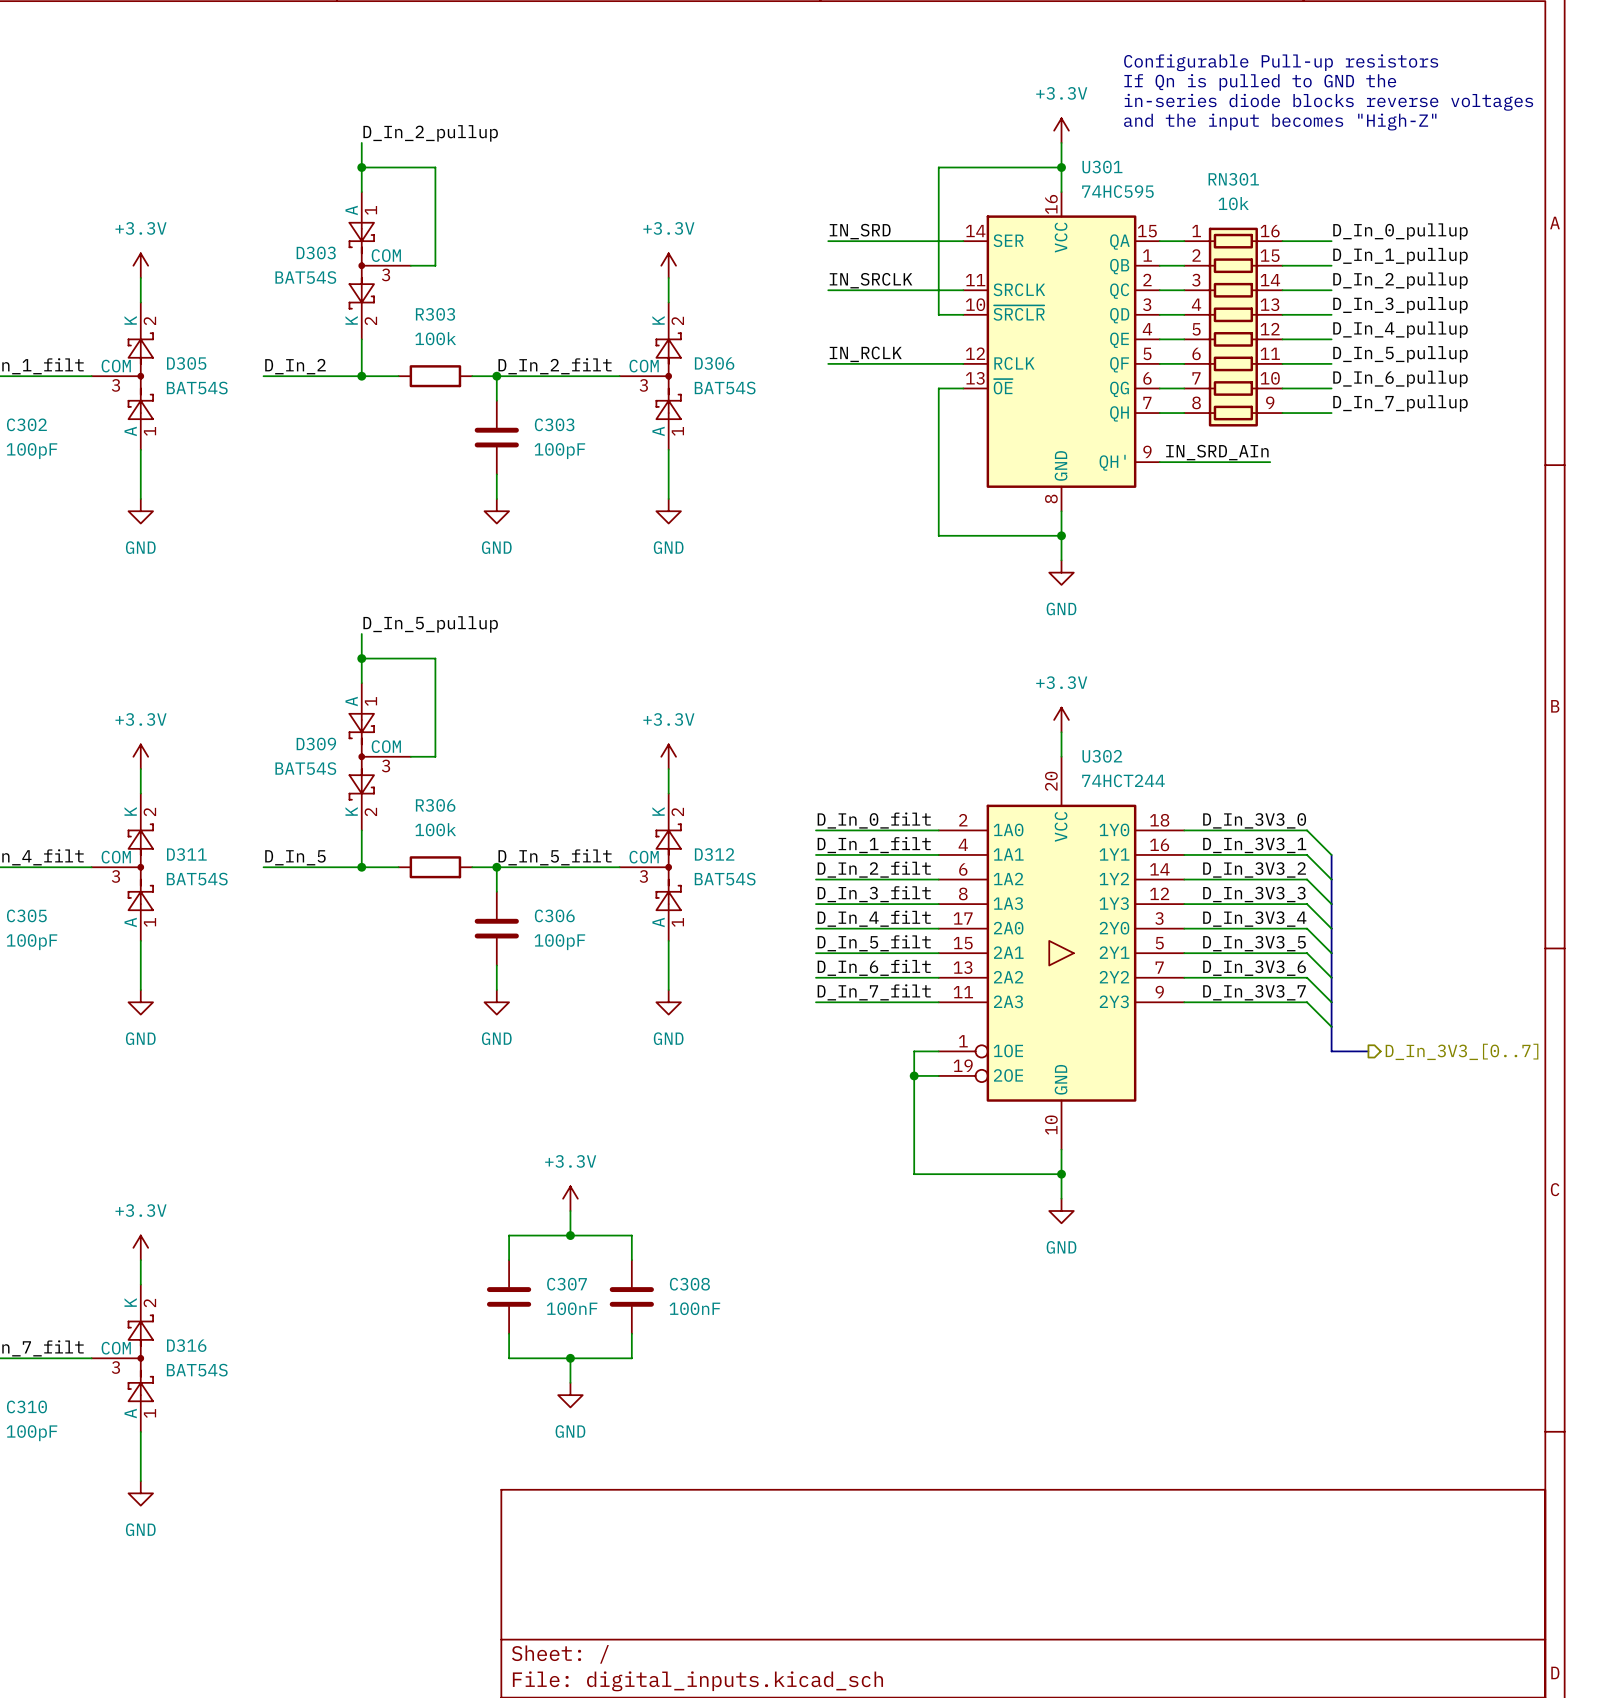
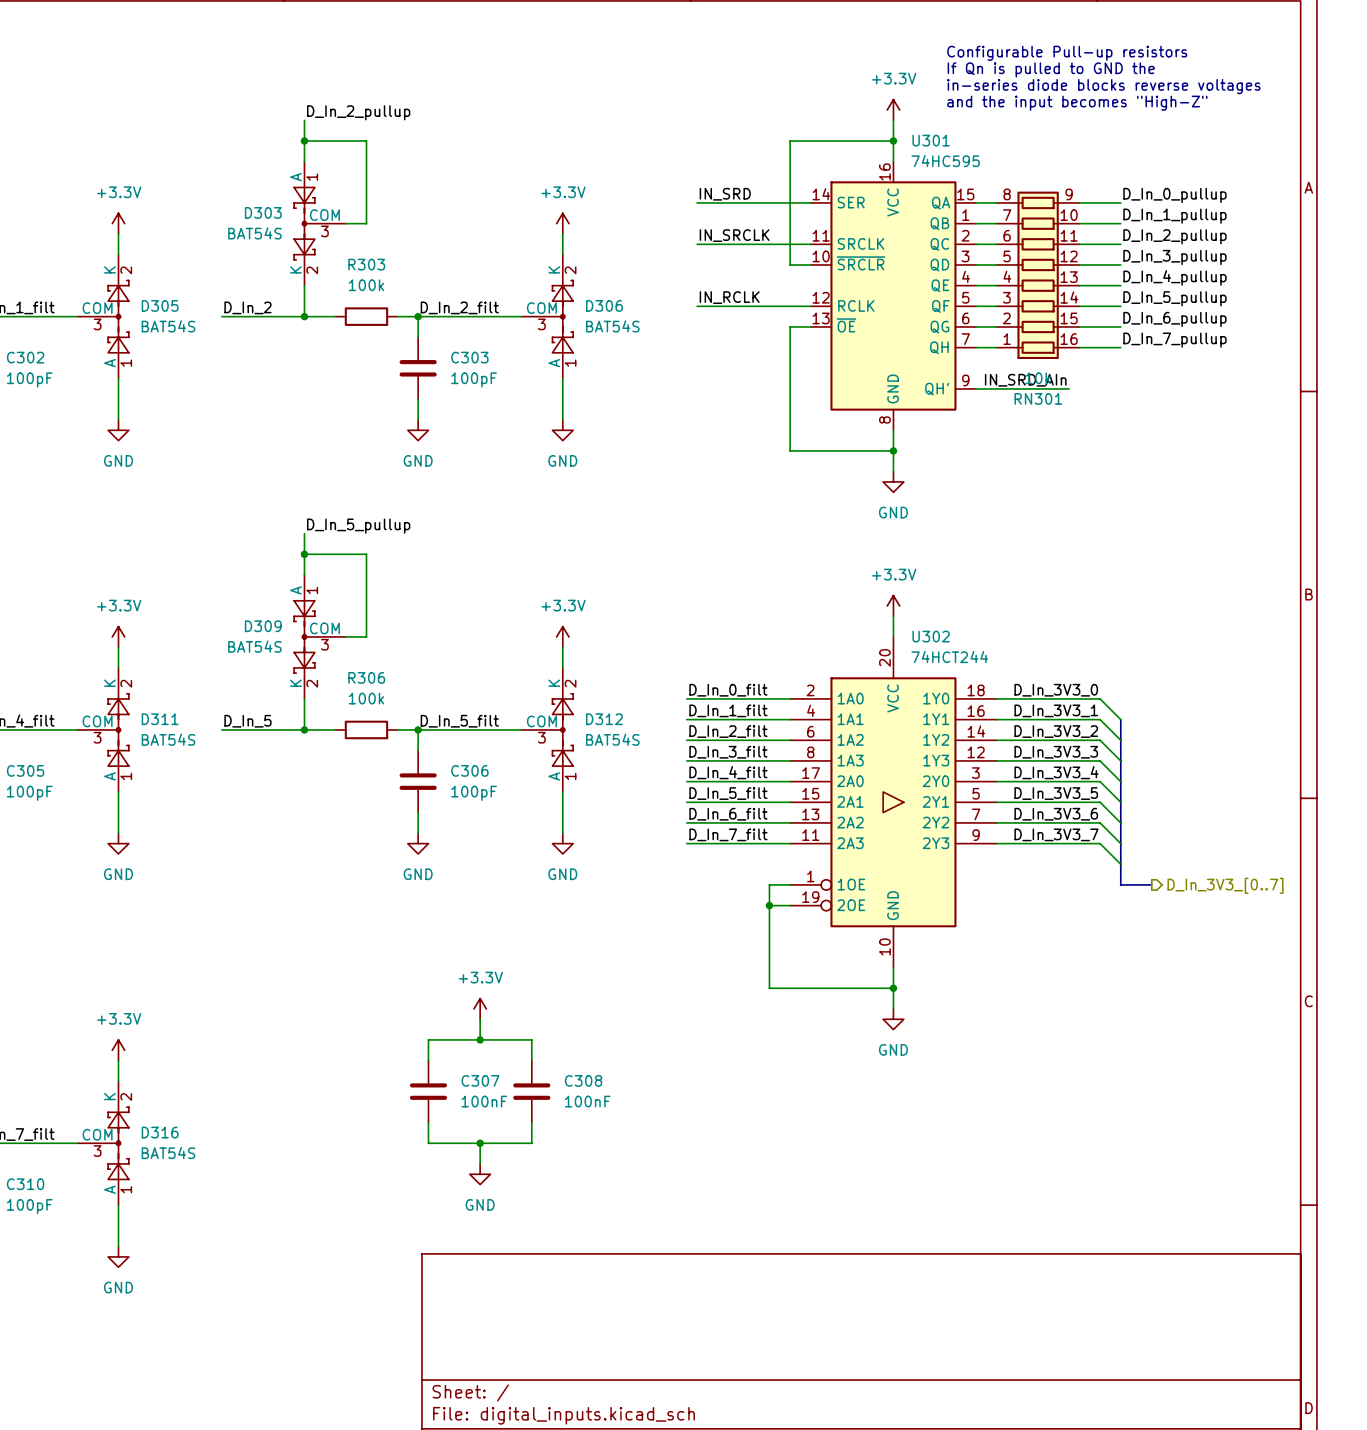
RN301 flip: as is (1233, 327) -> up-down (1038, 275)

